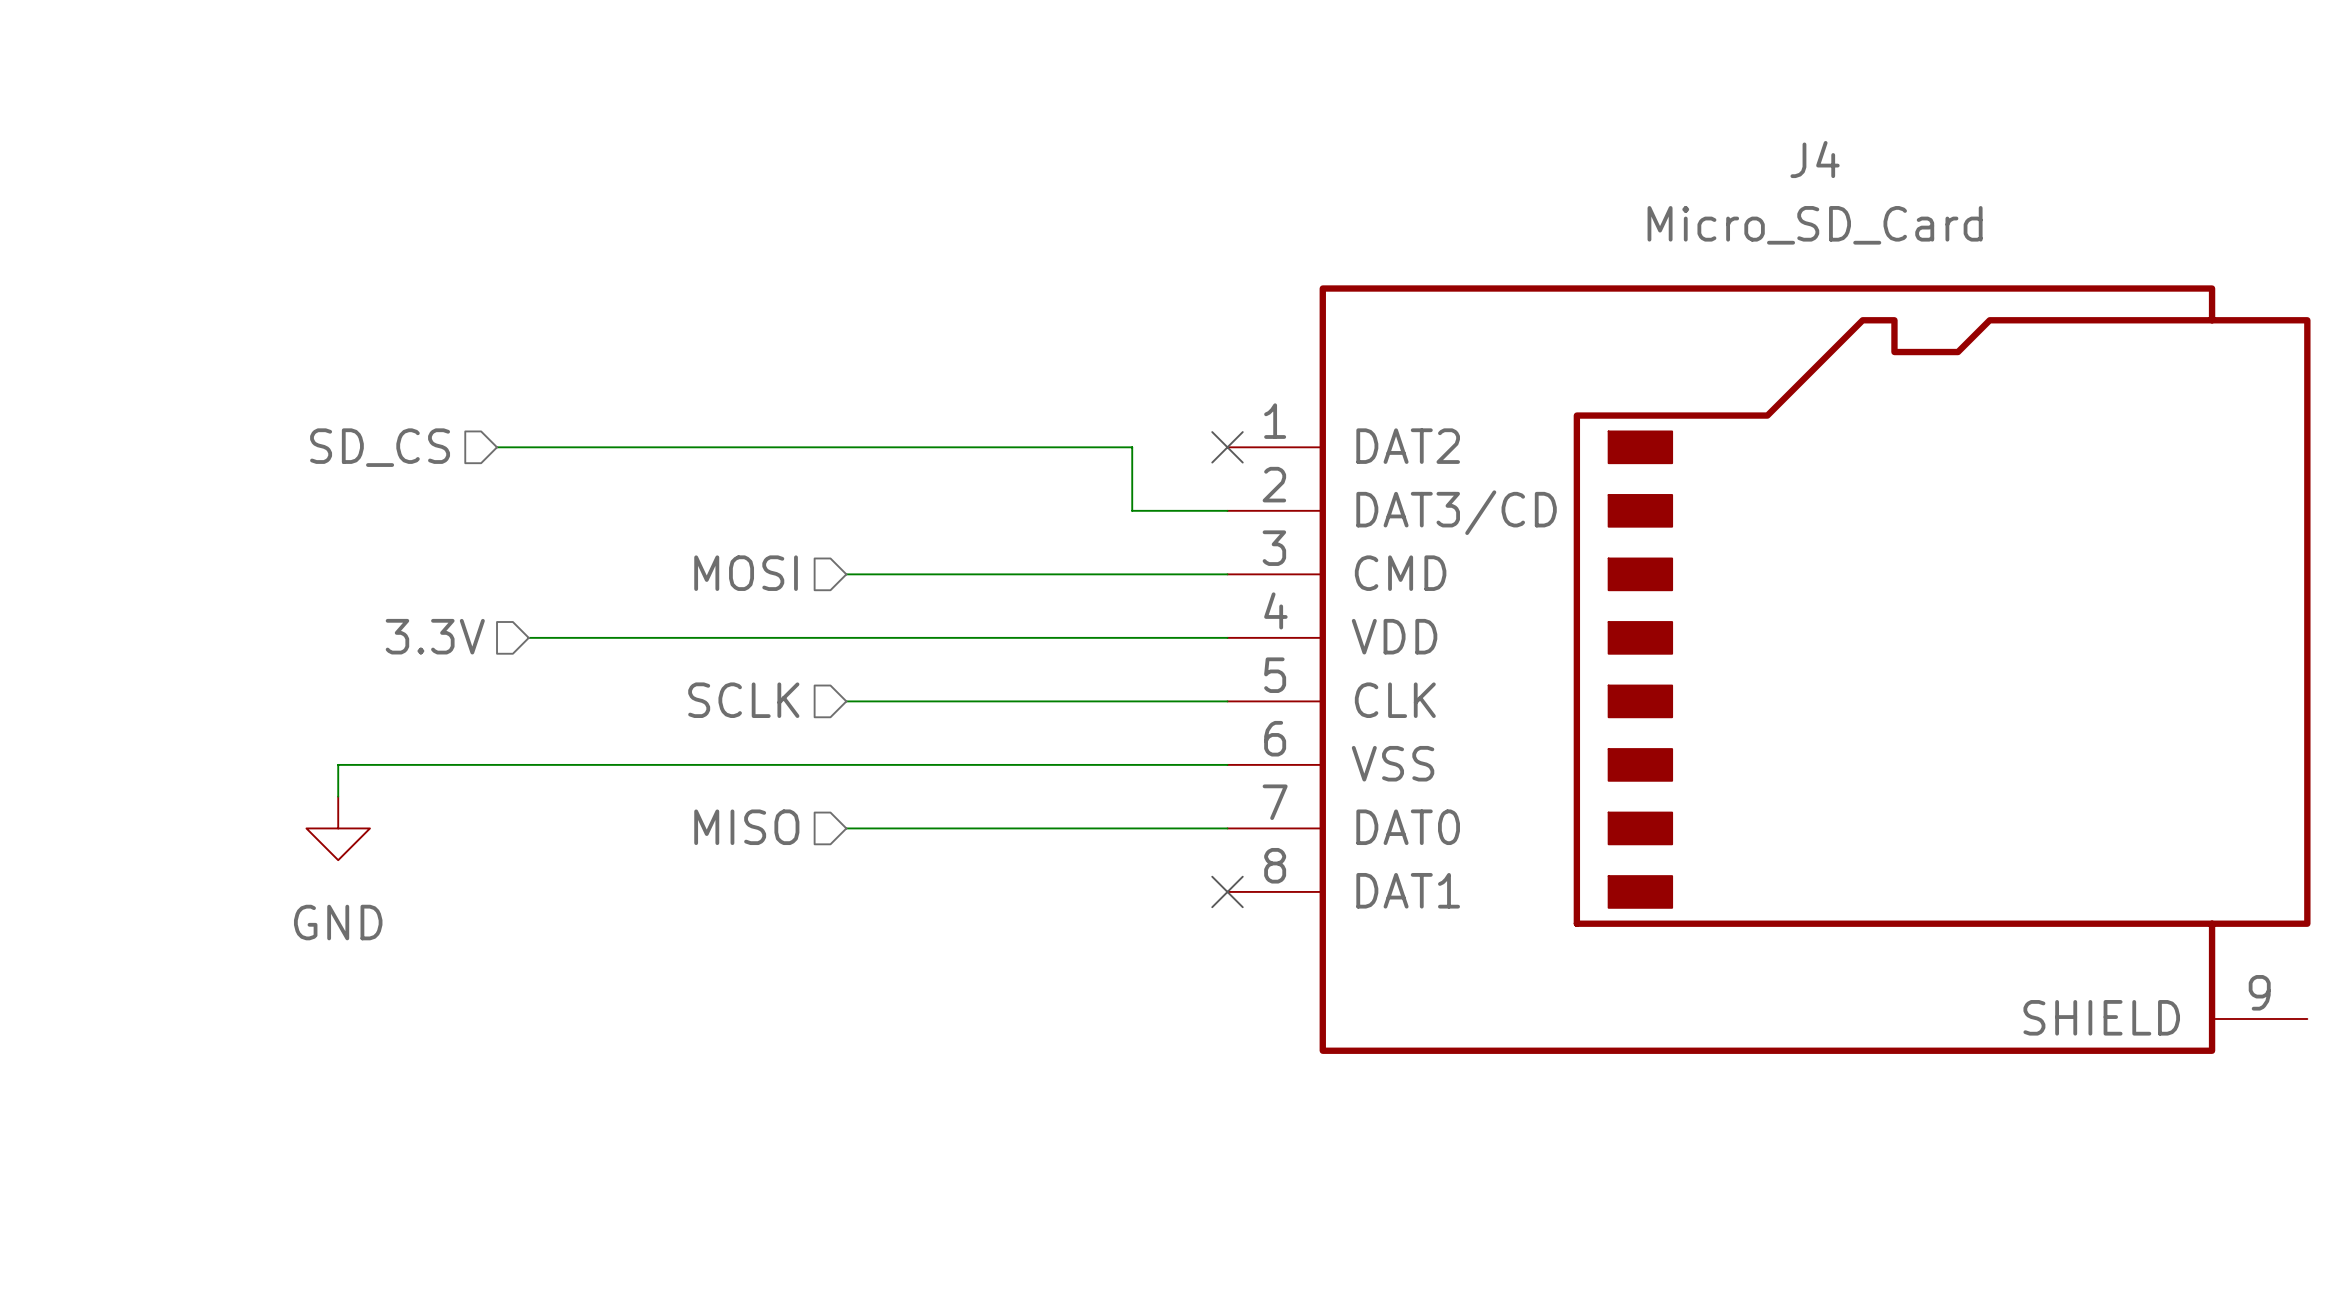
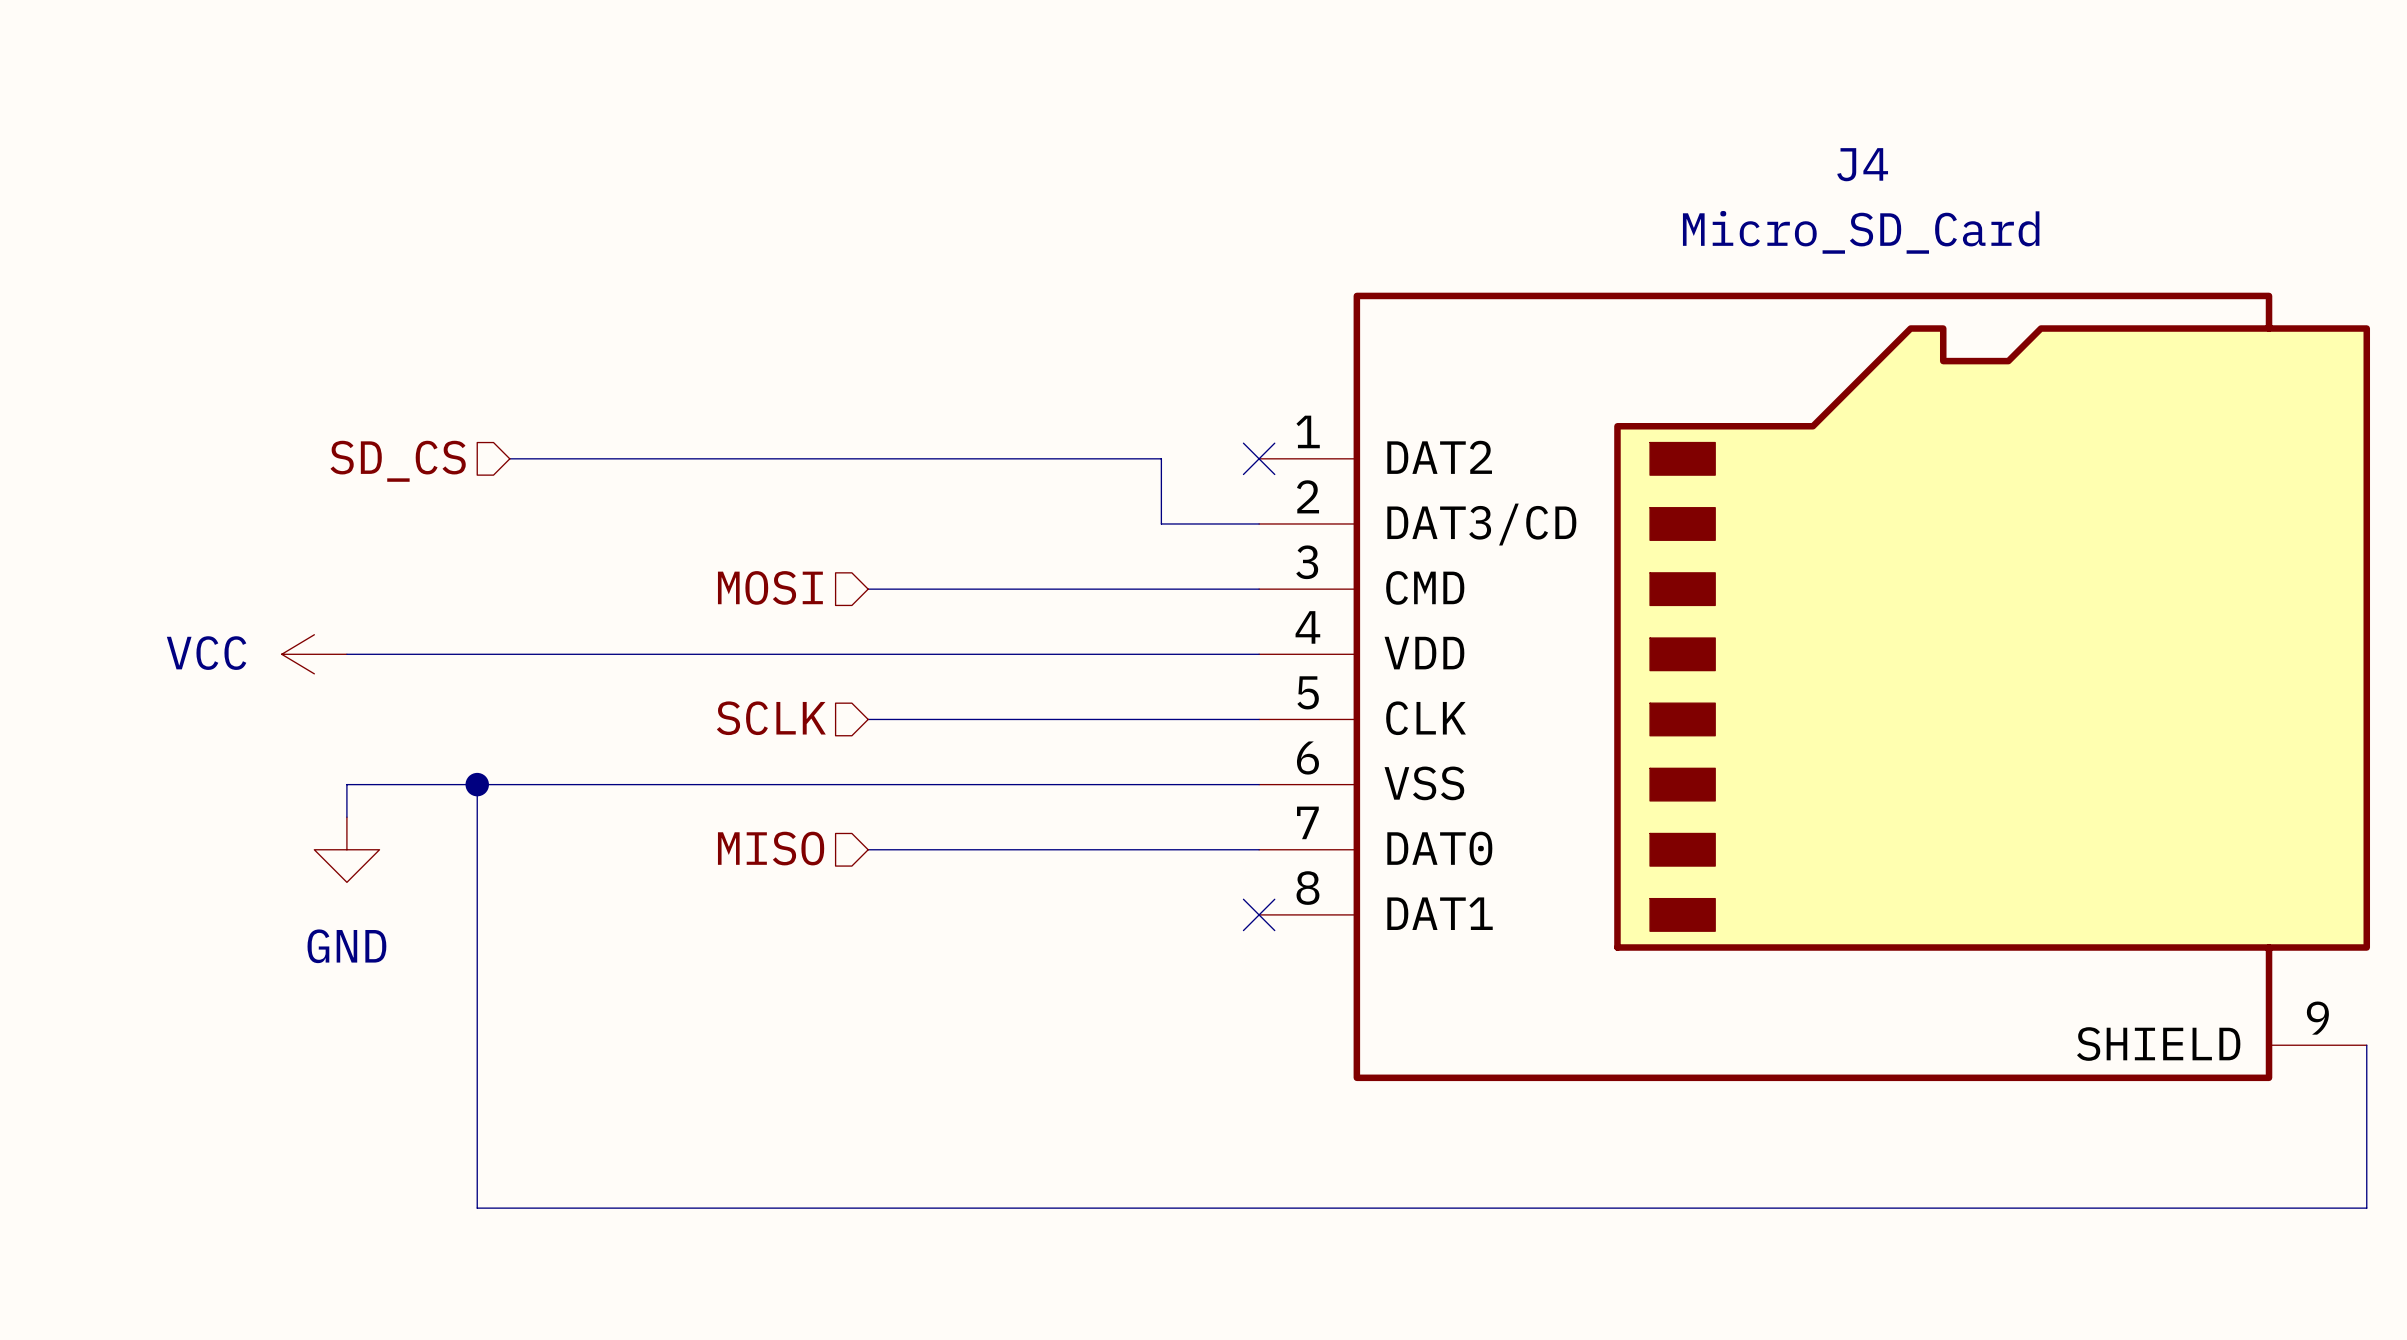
hierarchical label: 3.3V (435, 636) -> none
power symbol: none -> VCC (314, 654)
wire: none -> (346, 654) (542, 654)
wire: none -> (477, 784) (477, 1208) (2366, 1208) (2366, 1045)
junction: none -> (477, 784)

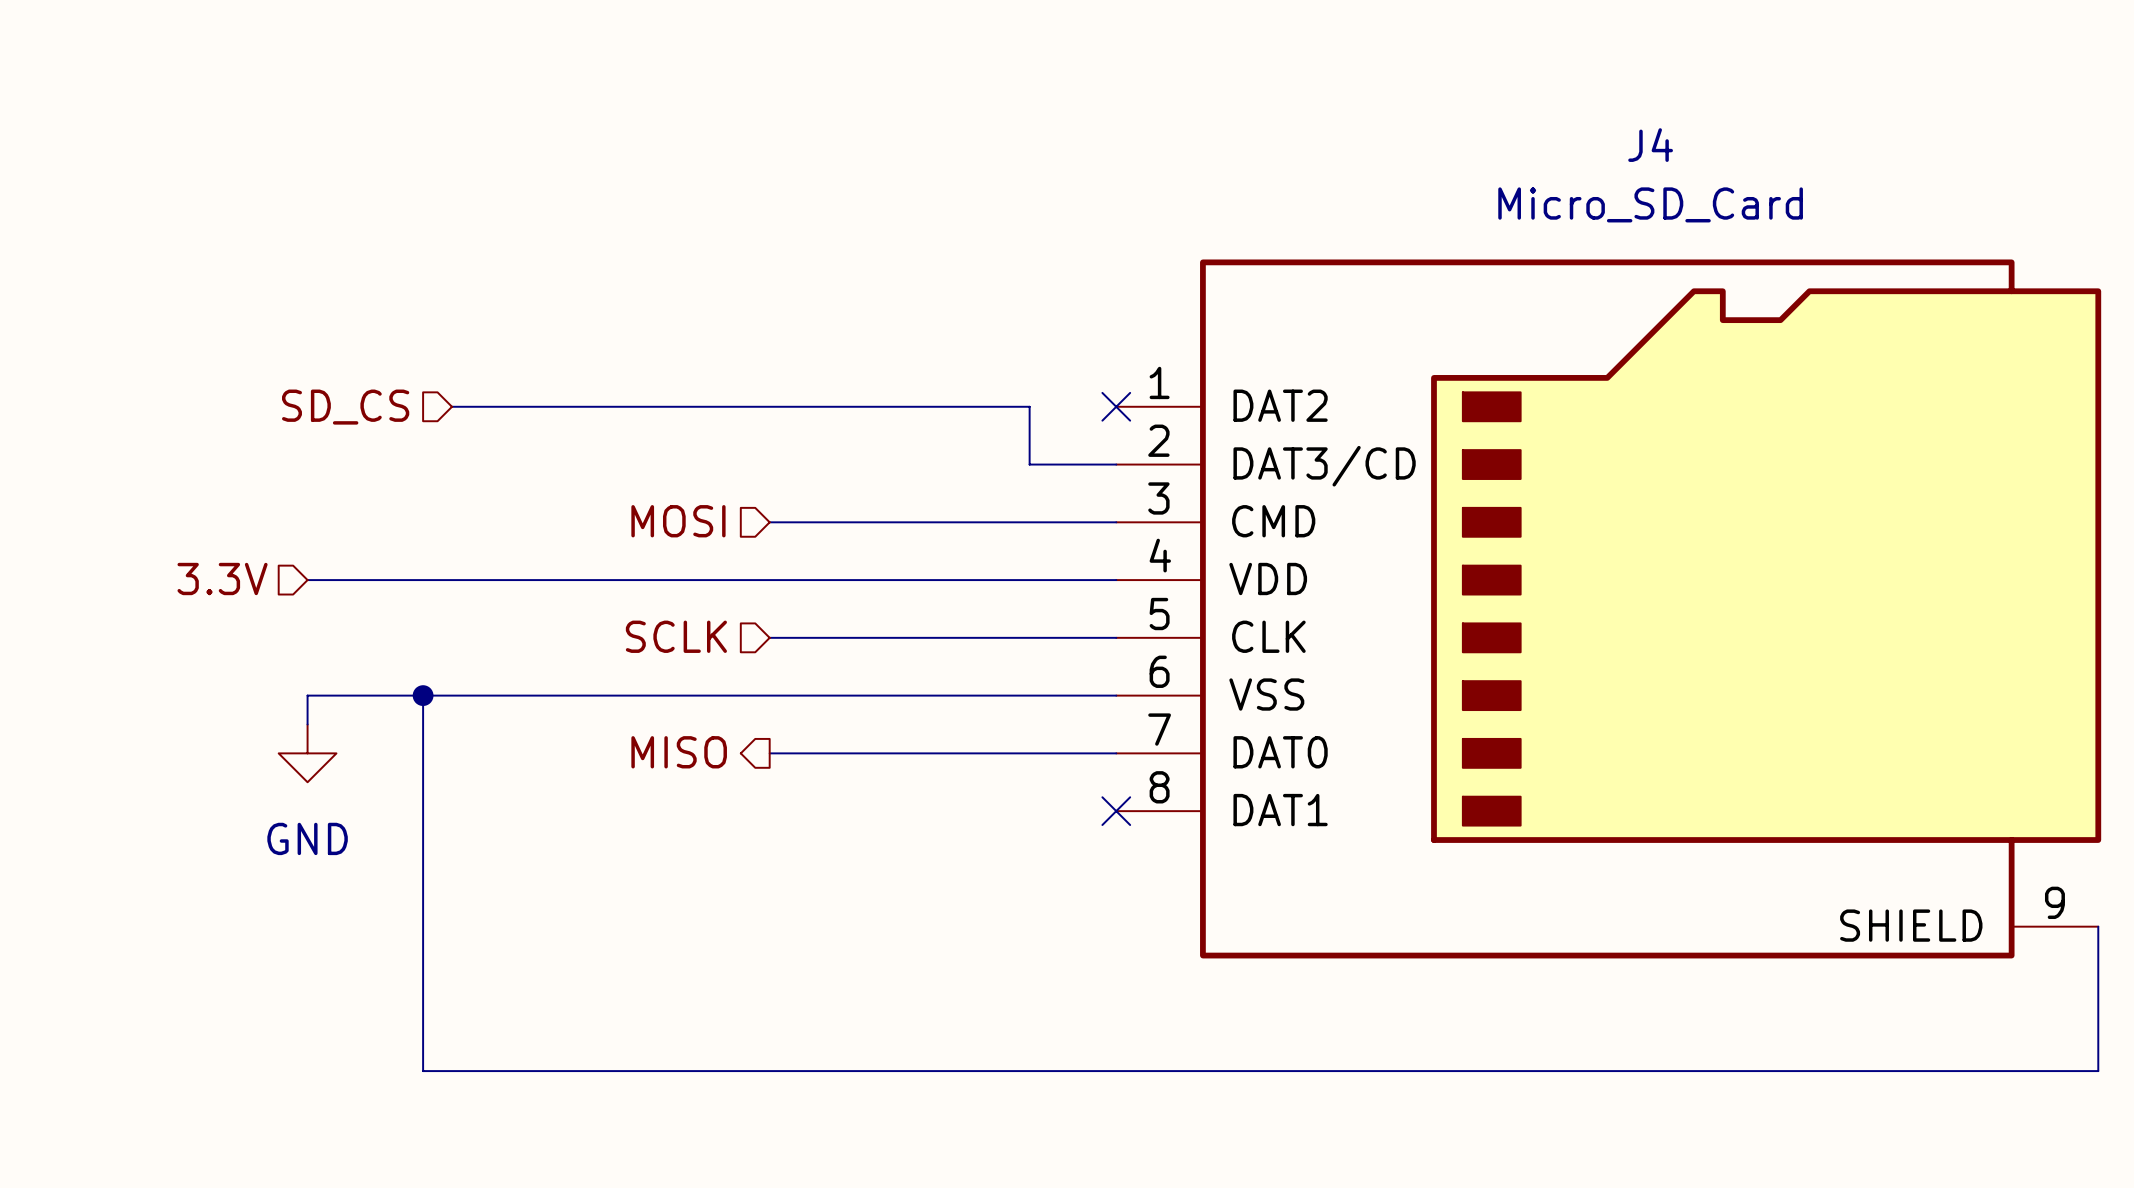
hierarchical label: none -> 3.3V (222, 579)
power symbol: VCC (314, 654) -> none
hierarchical label shape: input (771, 848) -> output (679, 752)

